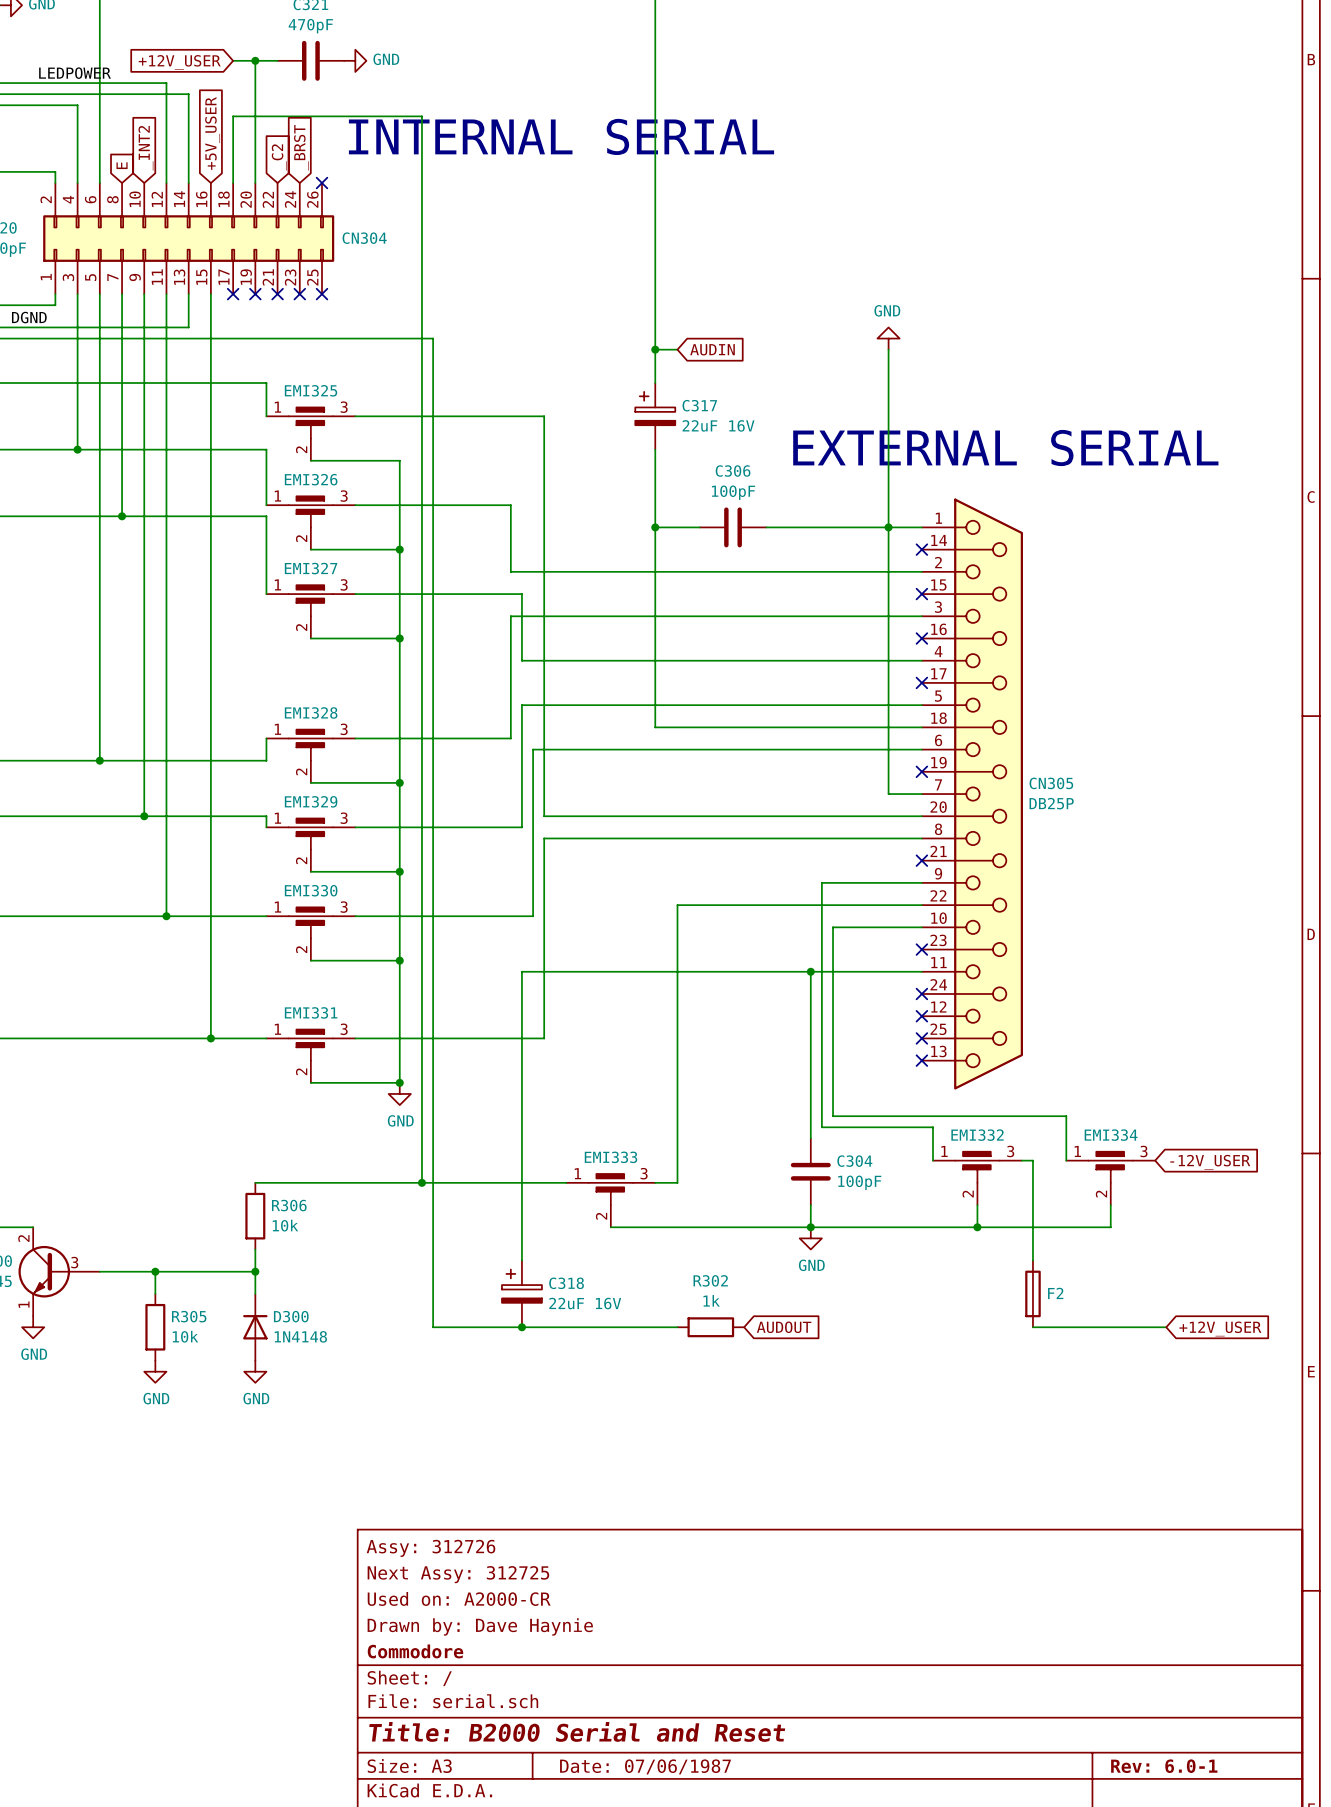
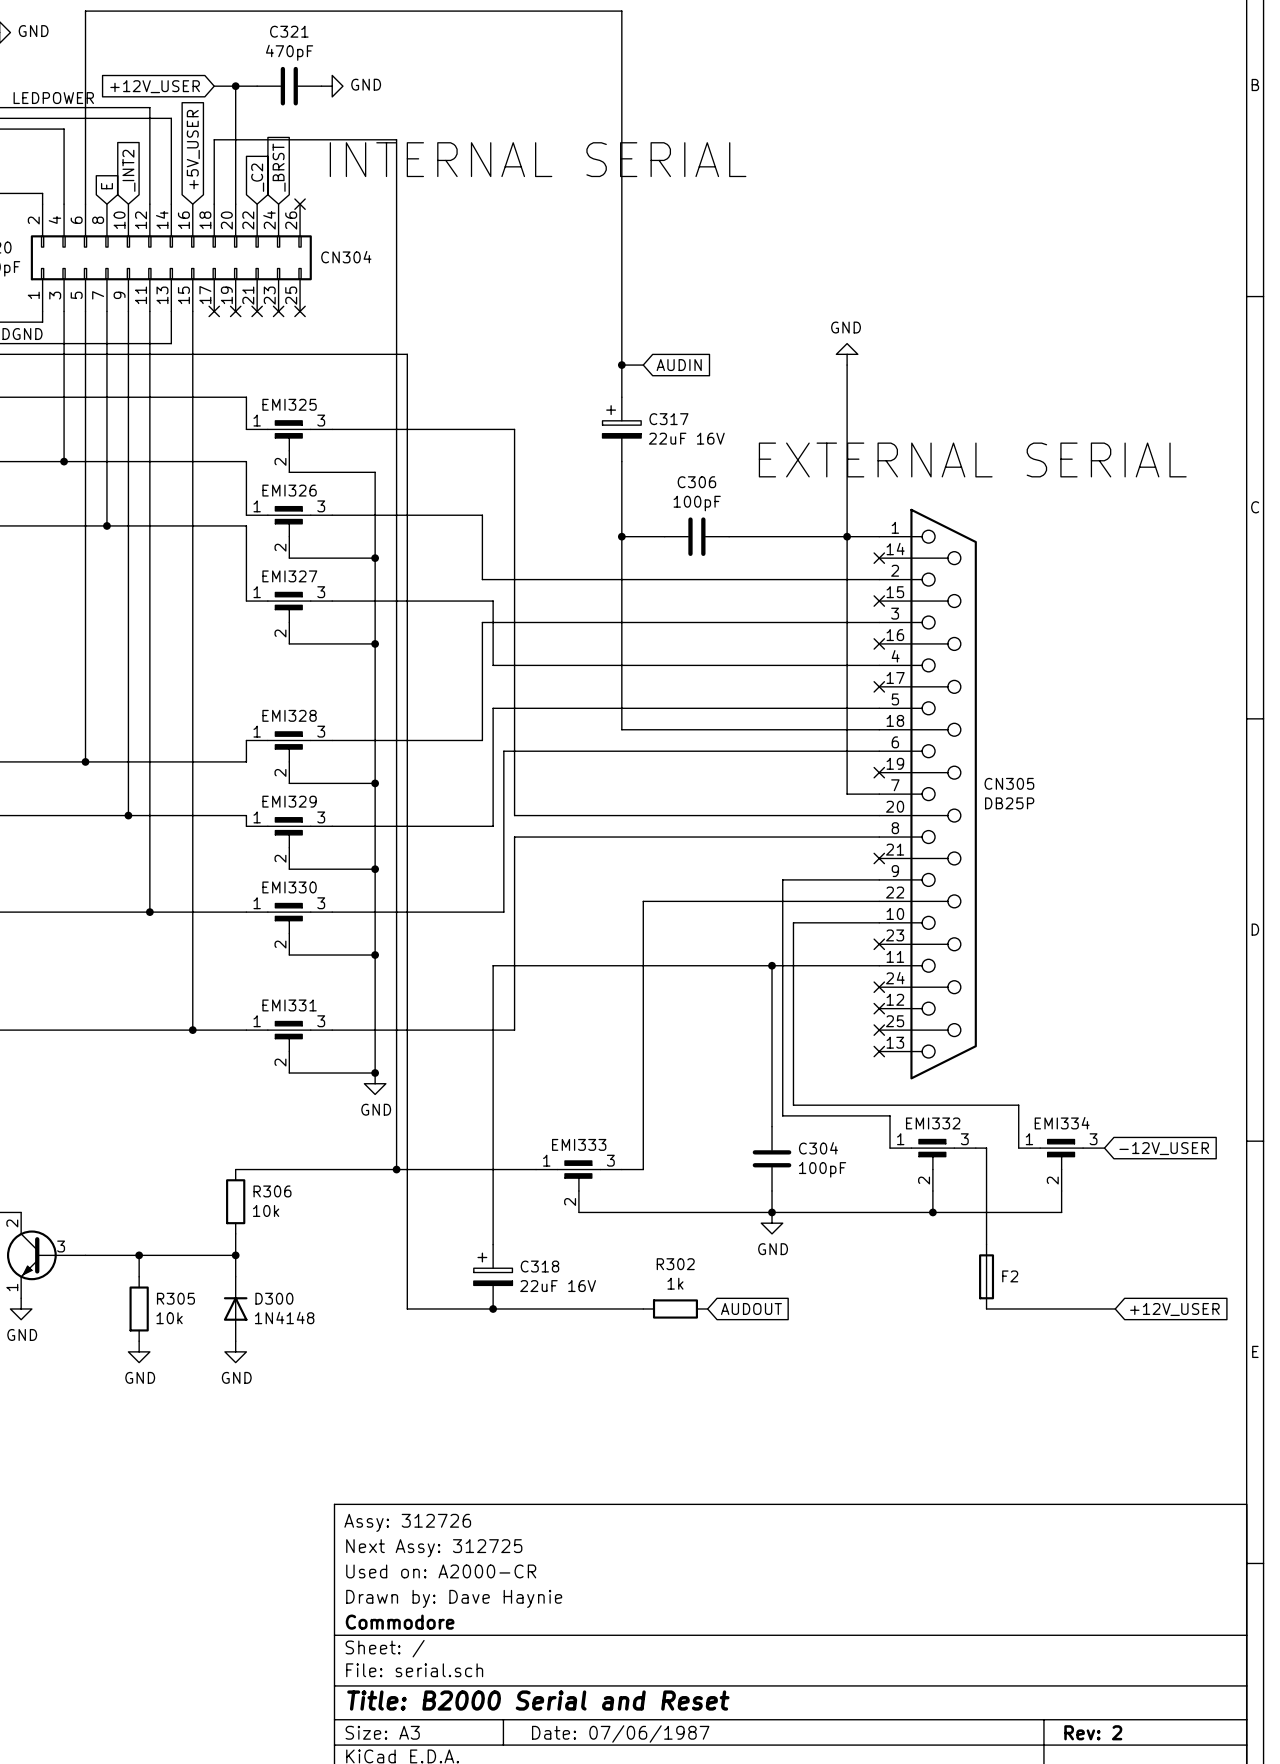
title block: Rev: 6.0-1 (1164, 1766) -> Rev: 2 (1093, 1732)

